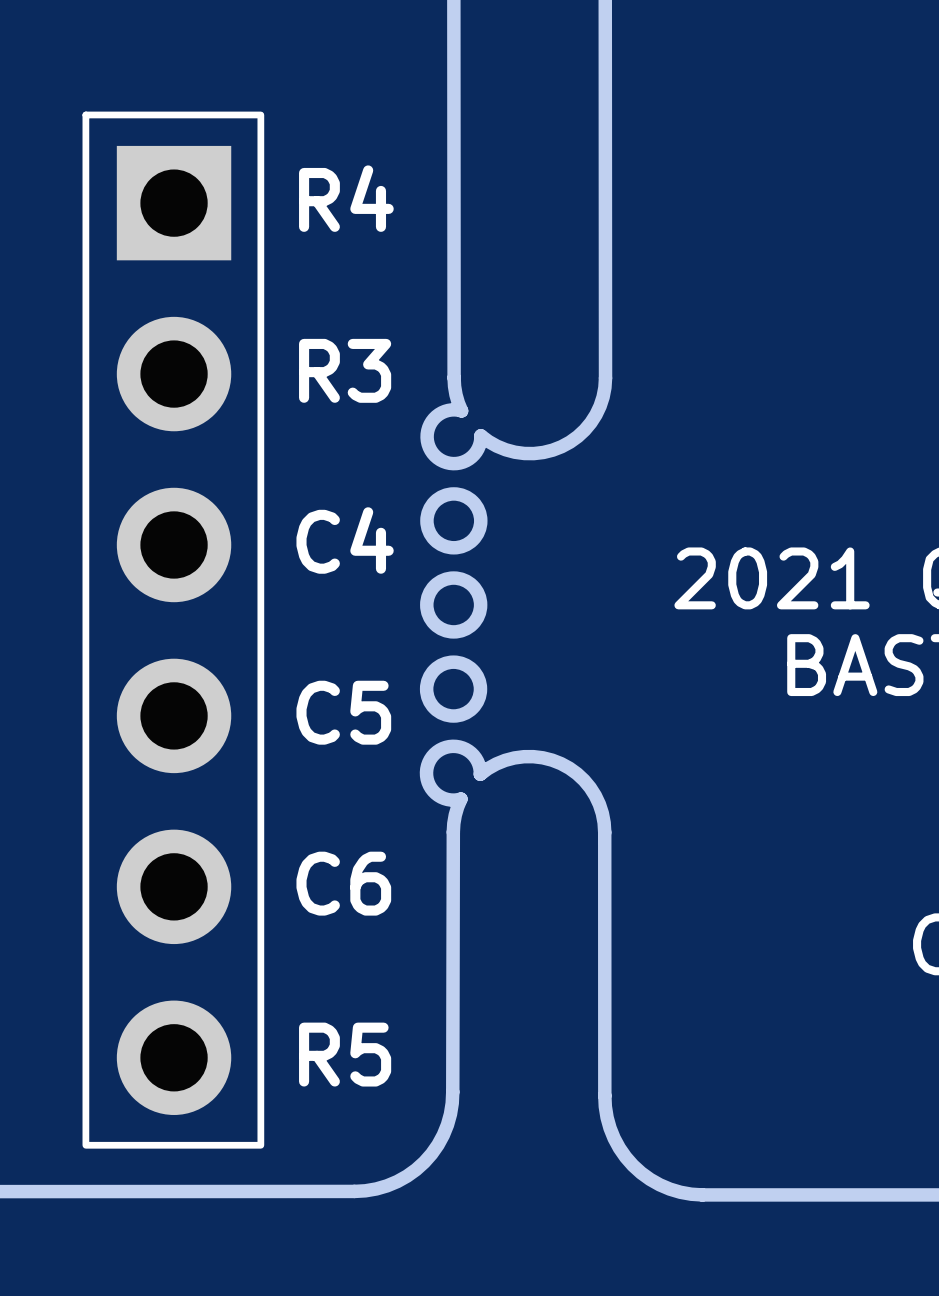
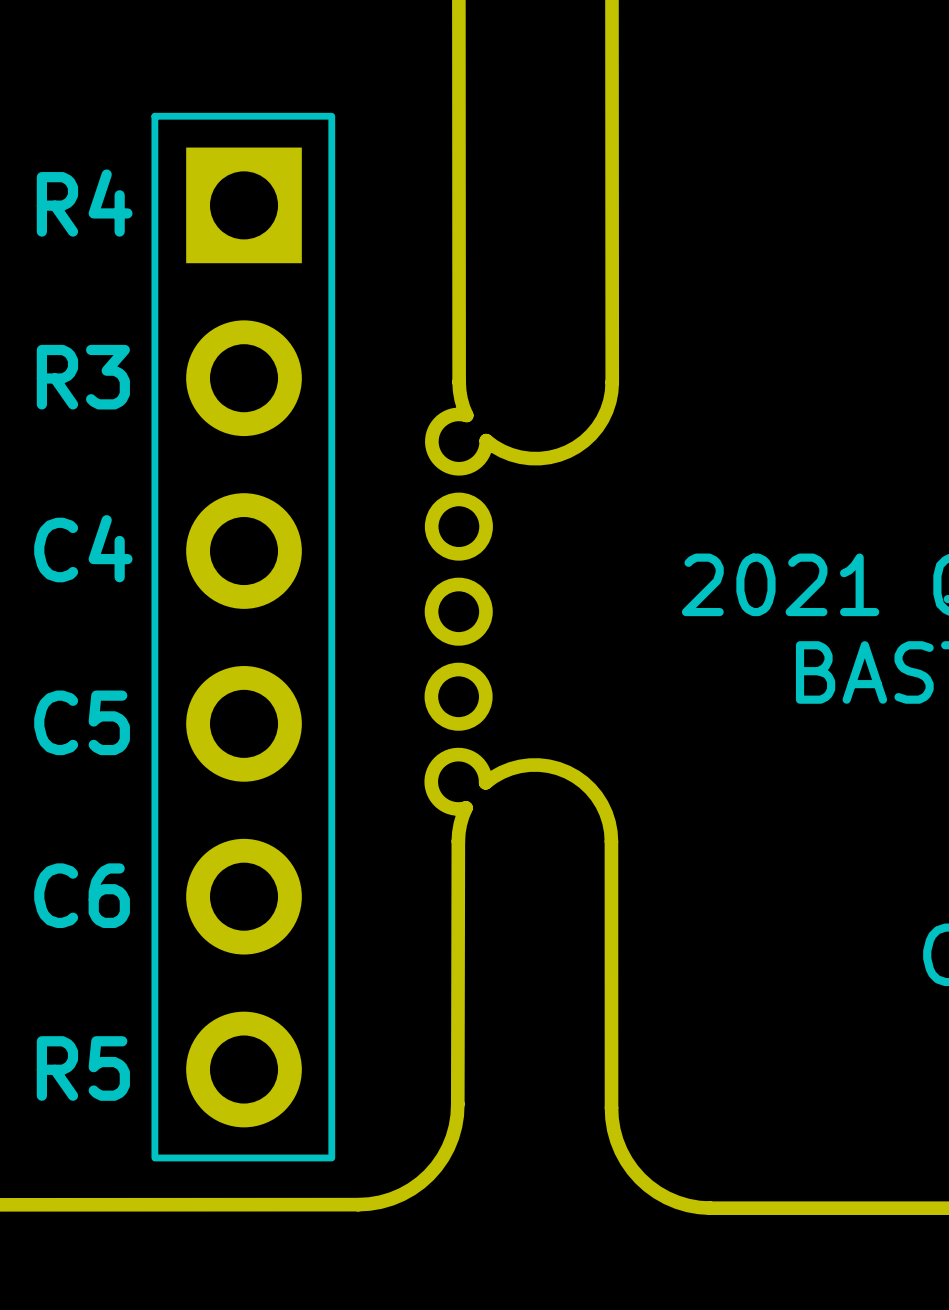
text position: R4 (346, 198) -> R4 (84, 203)
text position: R3 (345, 370) -> R3 (83, 377)
text position: C4 (345, 540) -> C4 (83, 548)
part position: (173, 630) -> (243, 637)
text position: C5 (343, 712) -> C5 (82, 722)
text position: C6 (343, 883) -> C6 (82, 895)
text position: R5 (345, 1054) -> R5 (83, 1068)

